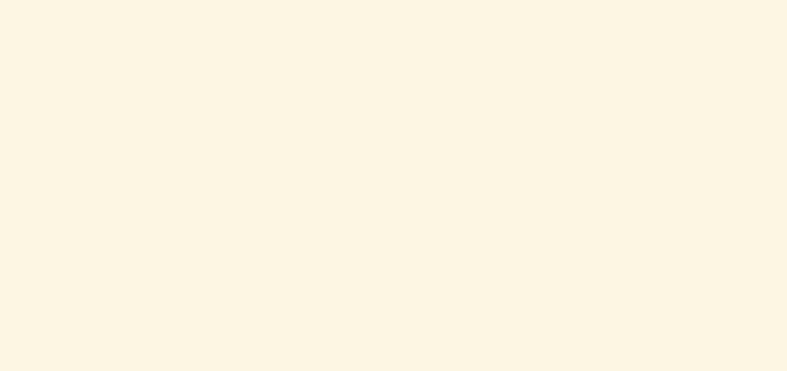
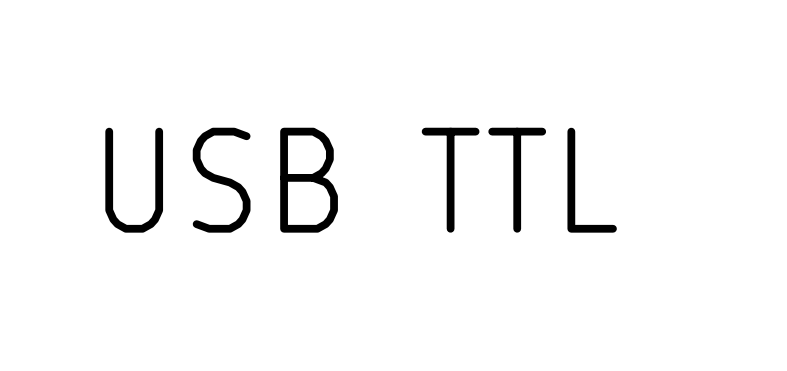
text: none -> USB TTL (361, 180)

